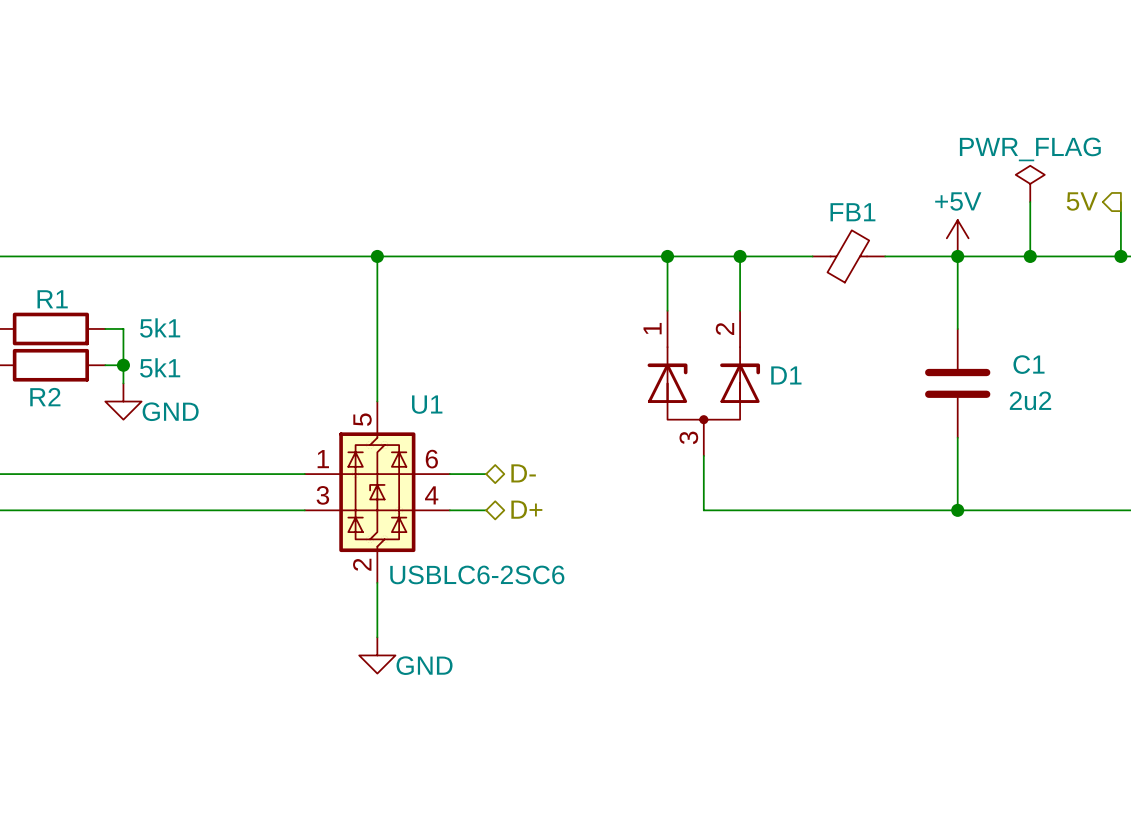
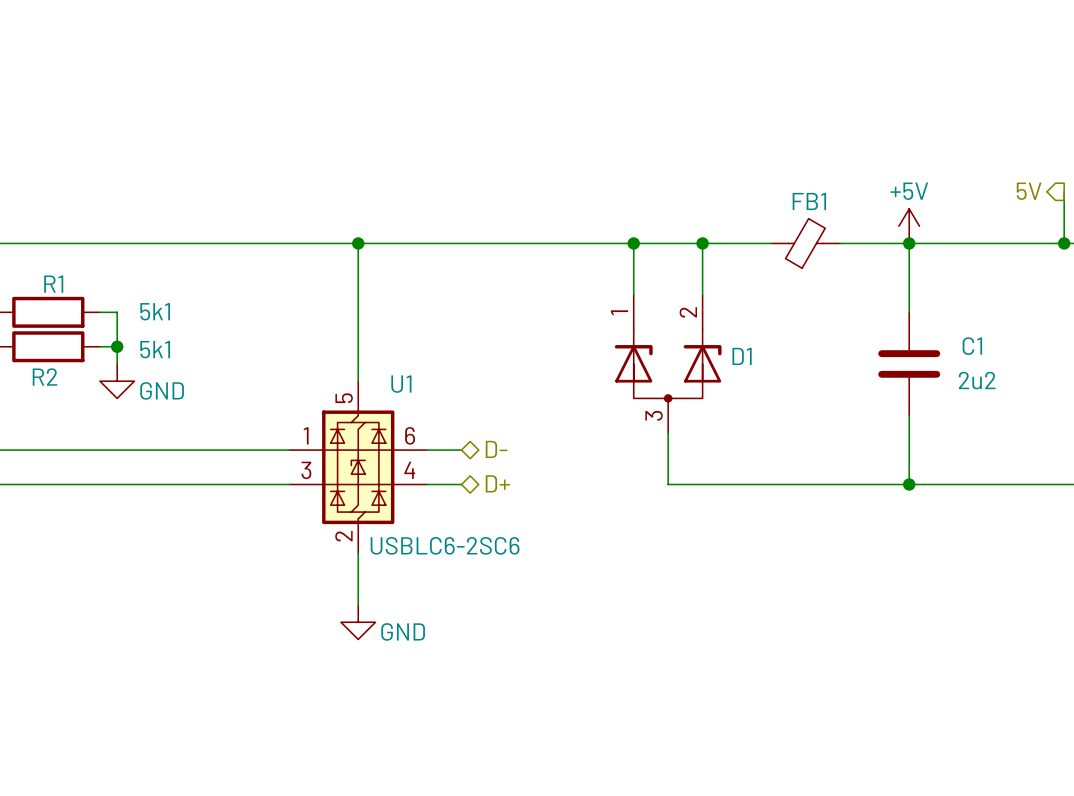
power symbol: PWR_FLAG (1030, 183) -> none
wire: (1030, 202) (1030, 256) -> none
junction: (1030, 256) -> none

